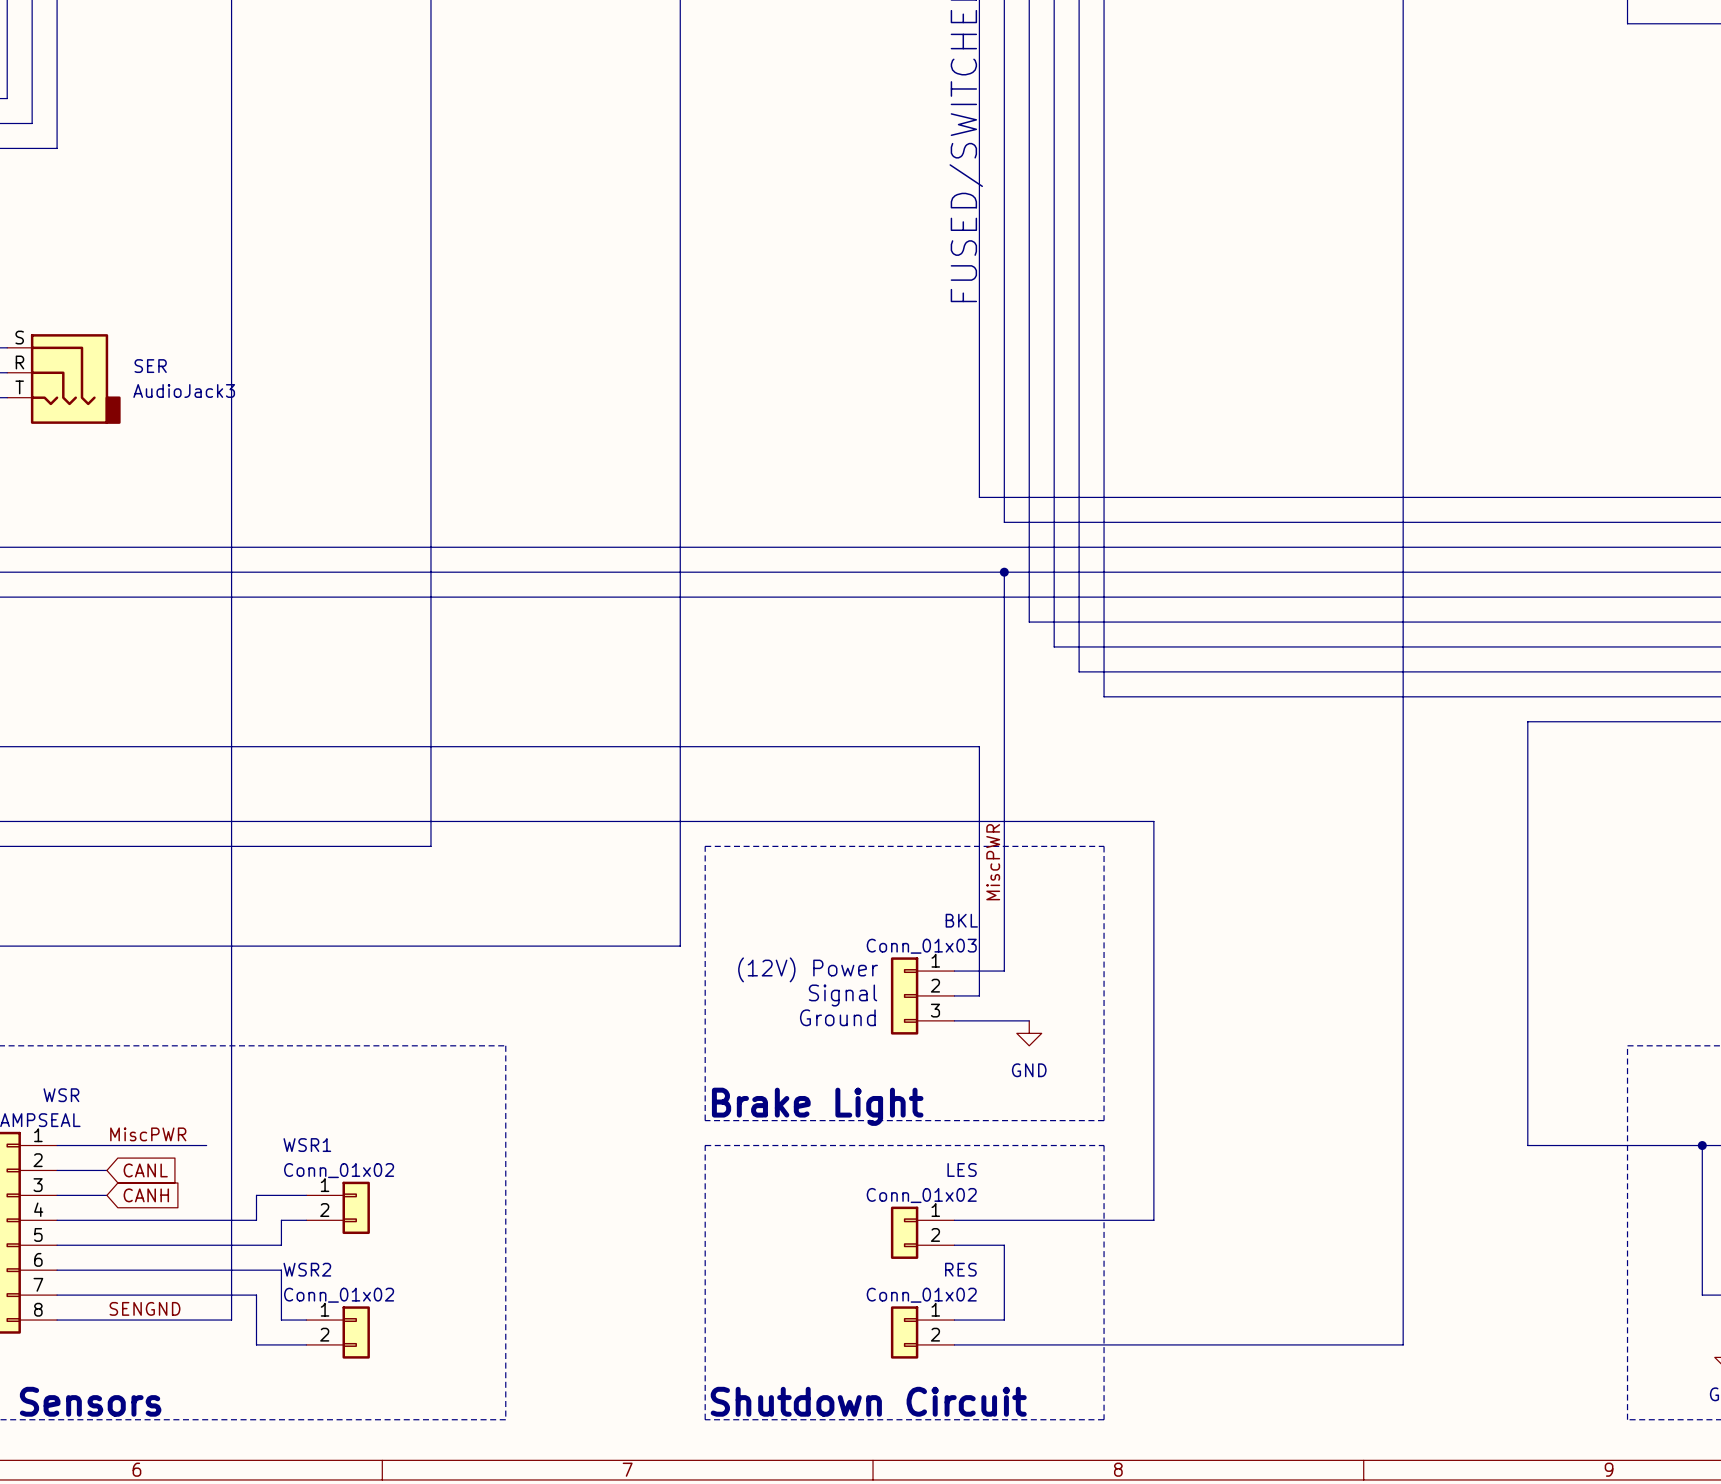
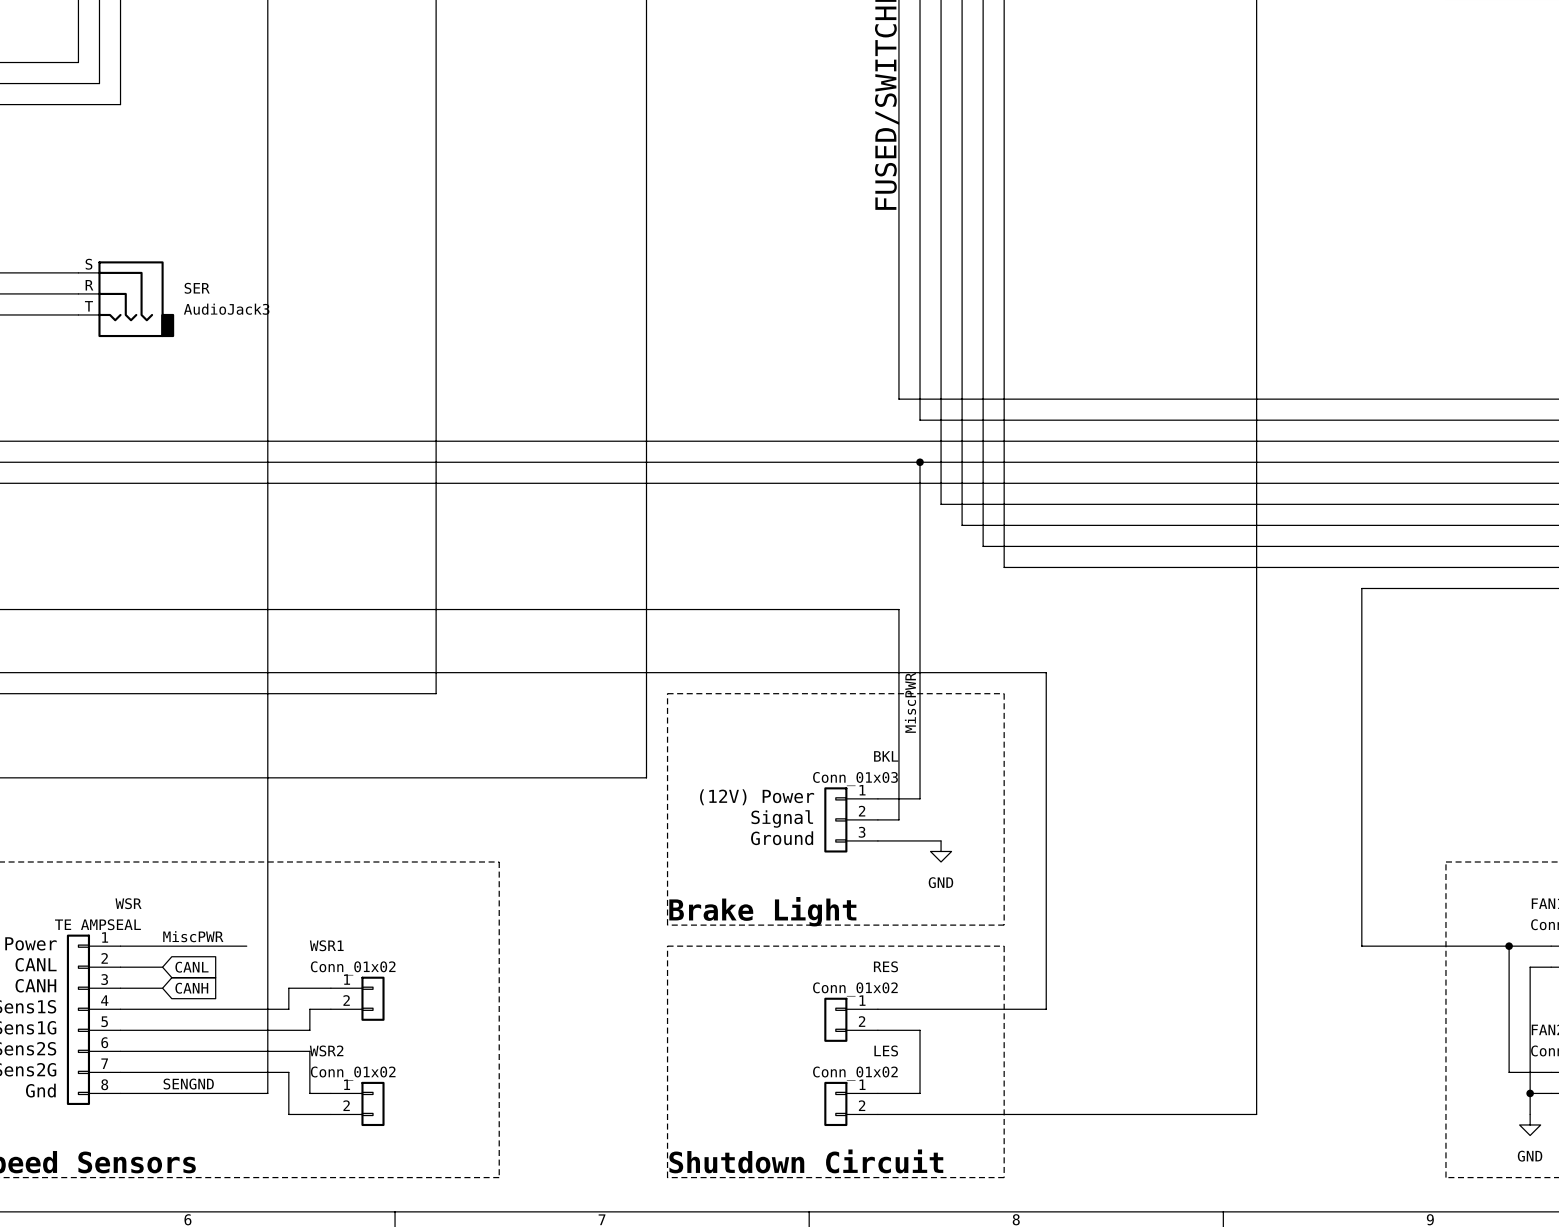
LES name: LES (962, 1169) -> RES (885, 966)
RES name: RES (960, 1269) -> LES (886, 1050)

